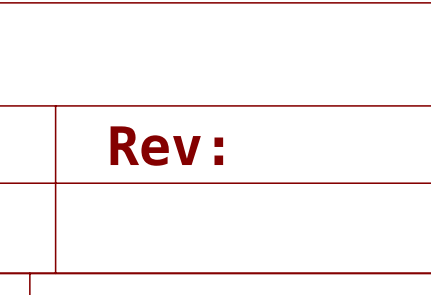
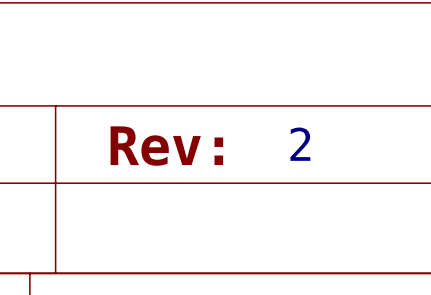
text: none -> 2 (300, 144)

